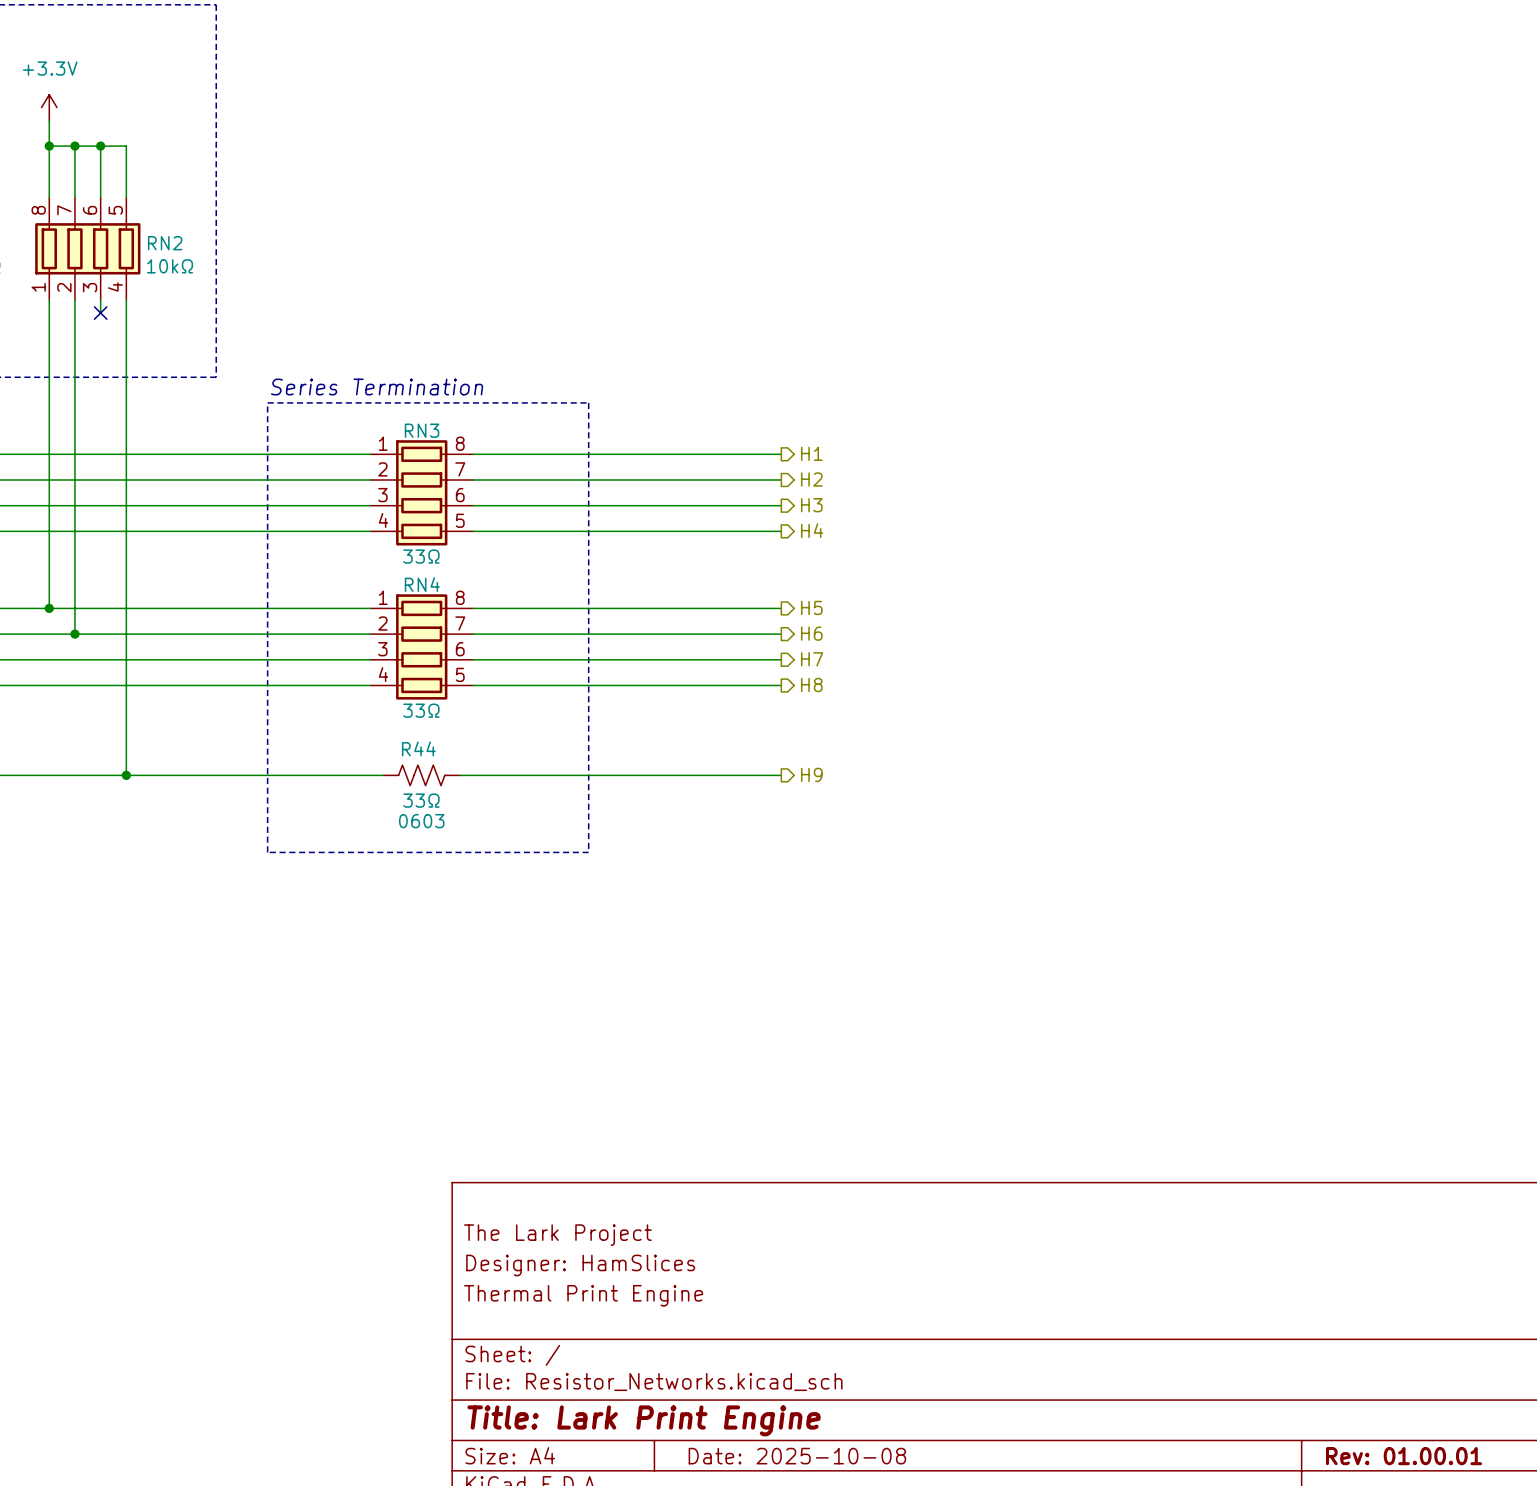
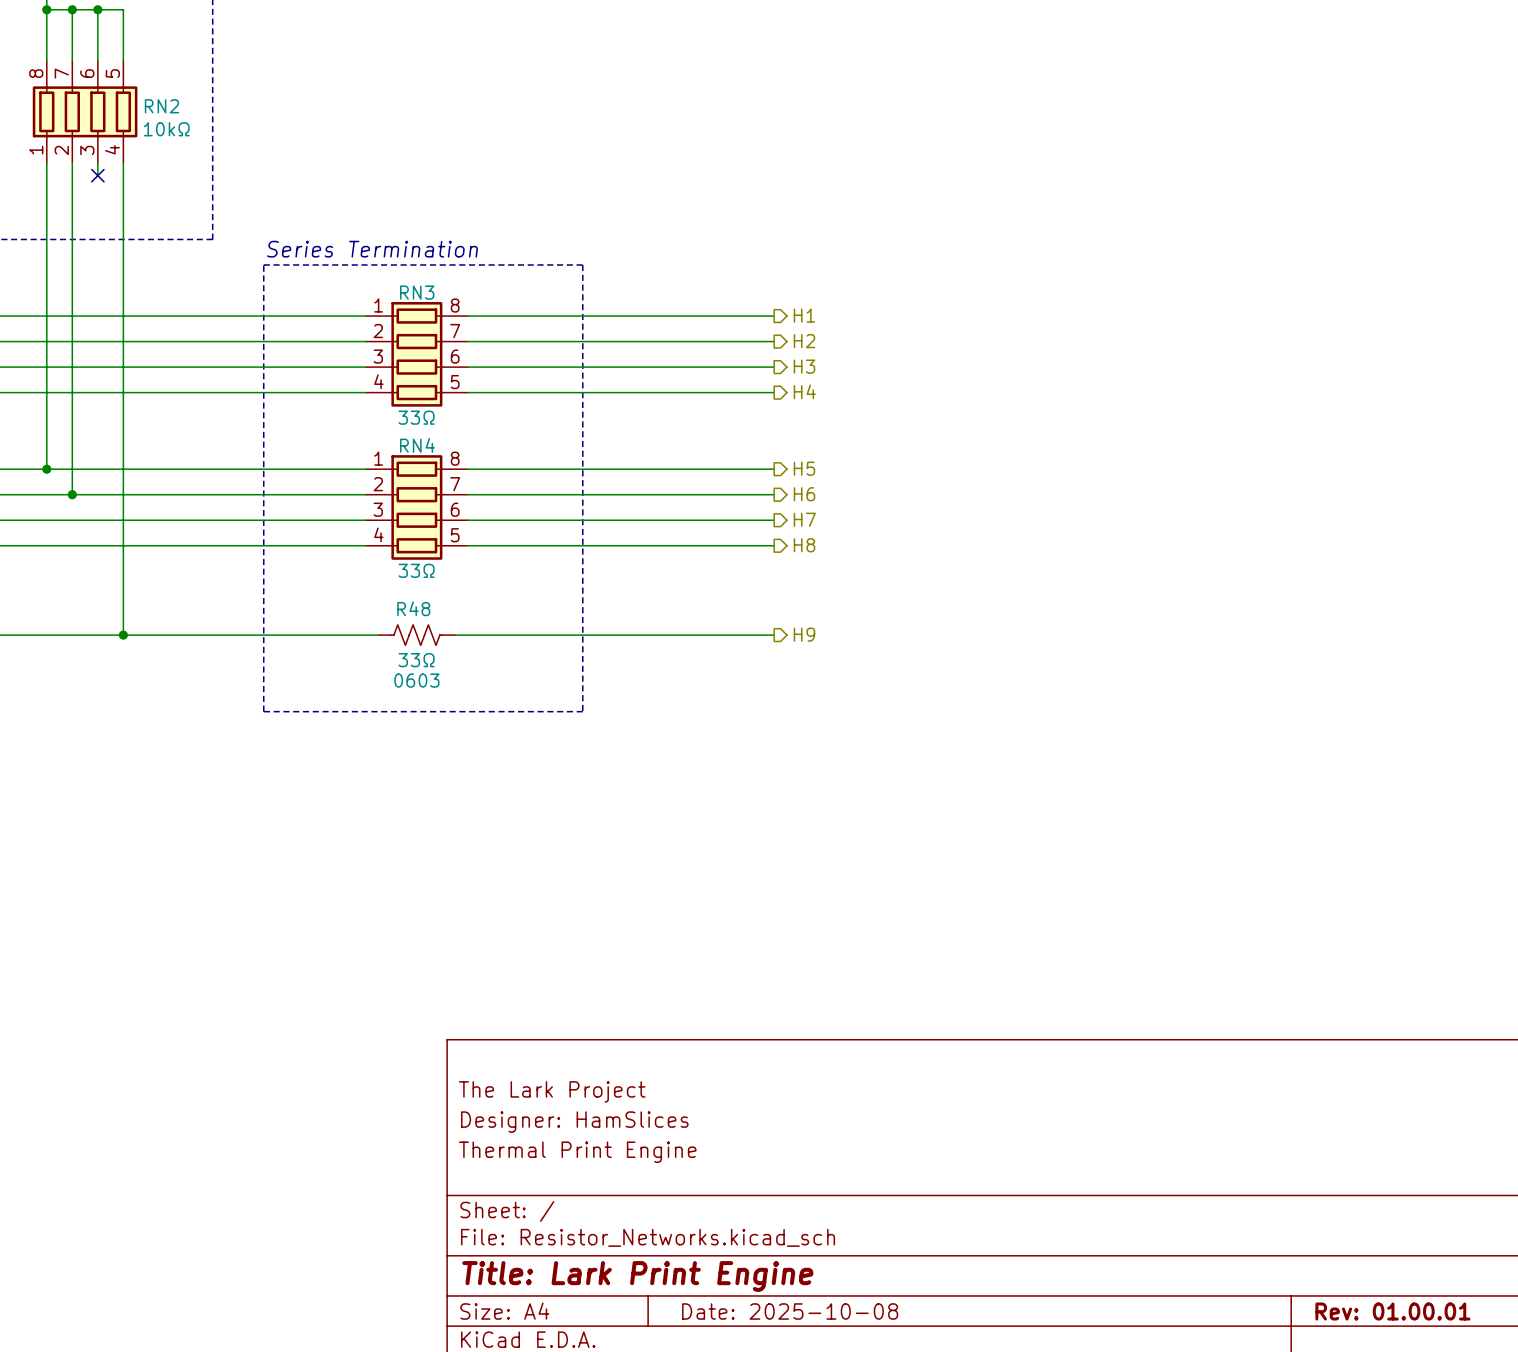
R44 name: R44 (418, 748) -> R48 (413, 608)

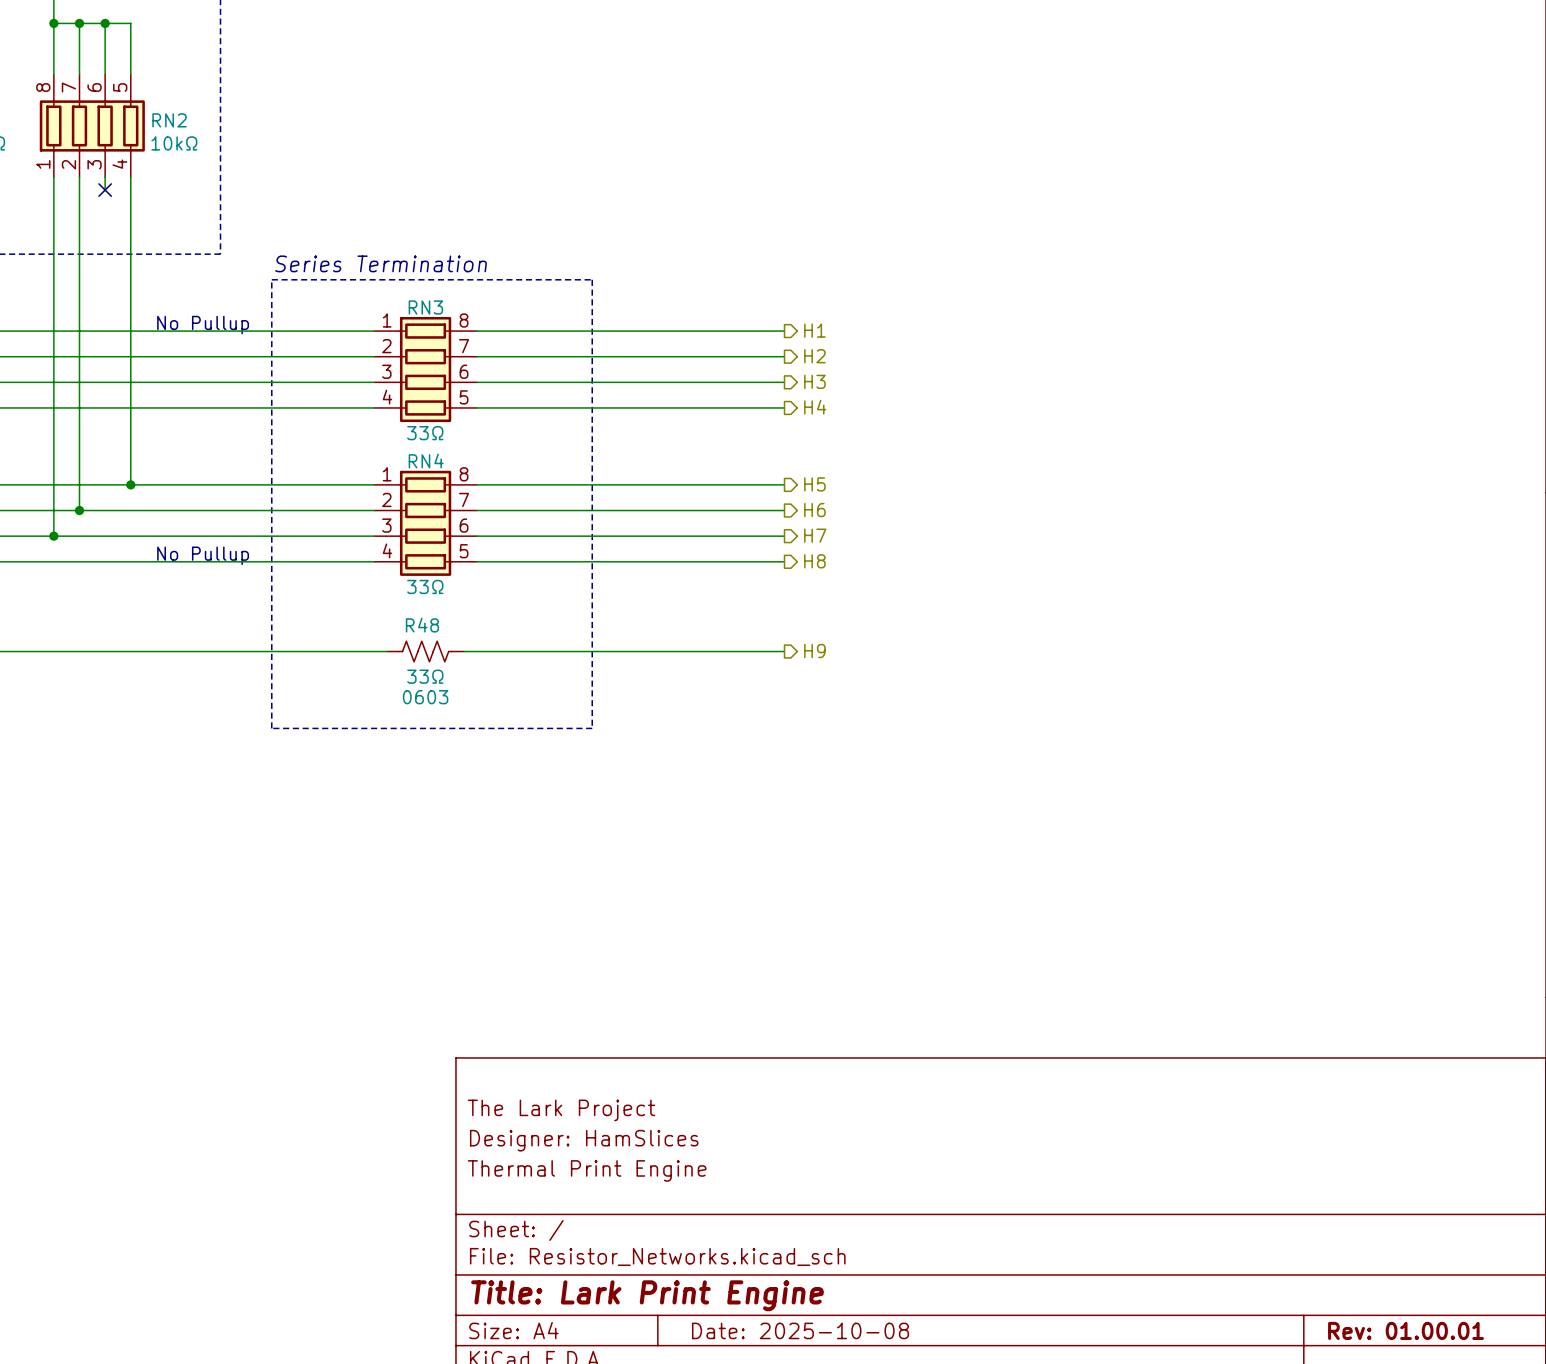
text: none -> No Pullup (203, 325)
wire: none -> (53, 484) (53, 536)
junction: (46, 469) -> none
wire: (123, 469) (123, 635) -> none
junction: none -> (130, 484)
junction: none -> (53, 536)
text: none -> No Pullup (203, 555)
junction: (123, 635) -> none

